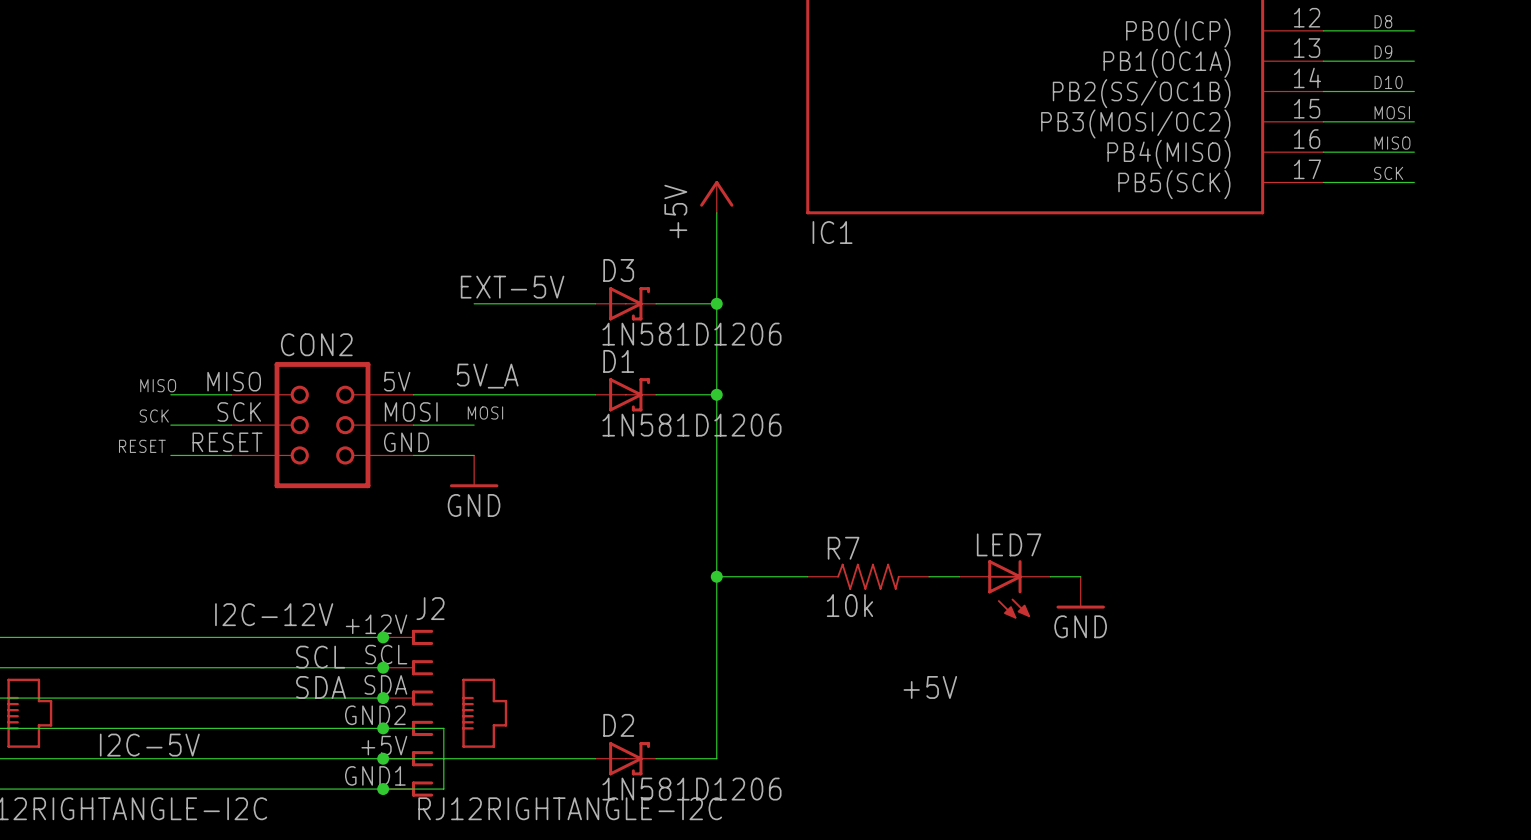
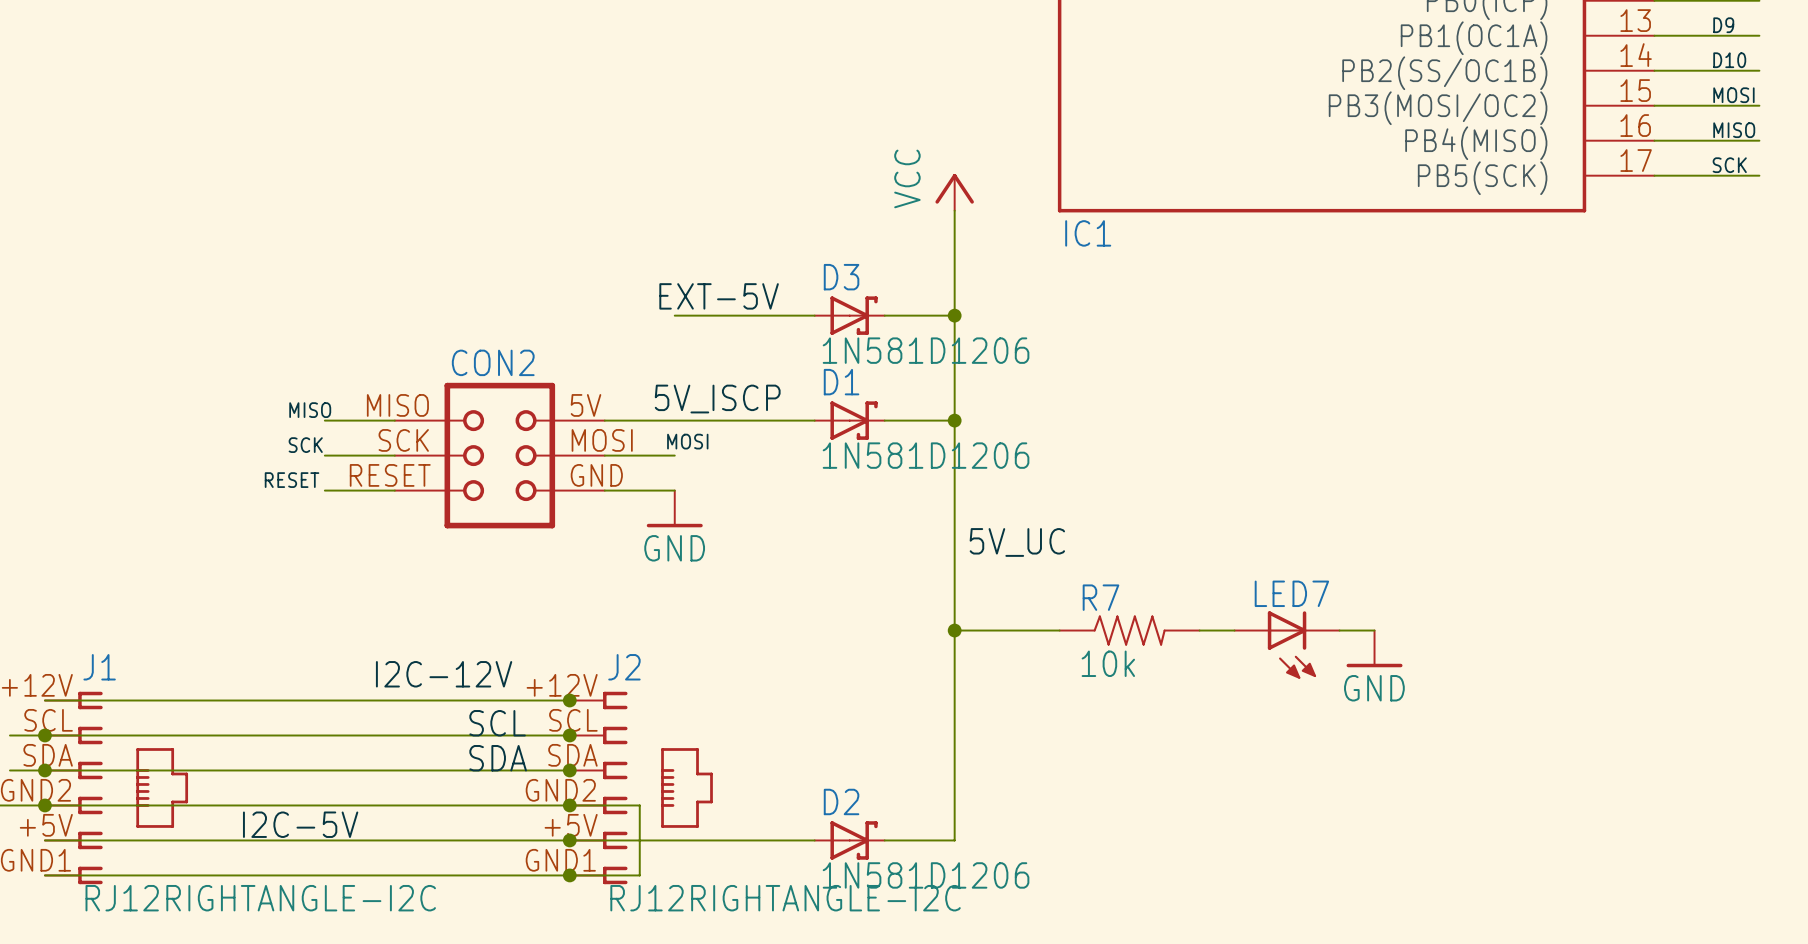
power symbol: +5V (716, 196) -> VCC (954, 192)
label: 5V_A (487, 376) -> 5V_ISCP (717, 399)
label: none -> 5V_UC (1017, 542)
label: +5V (930, 687) -> none

